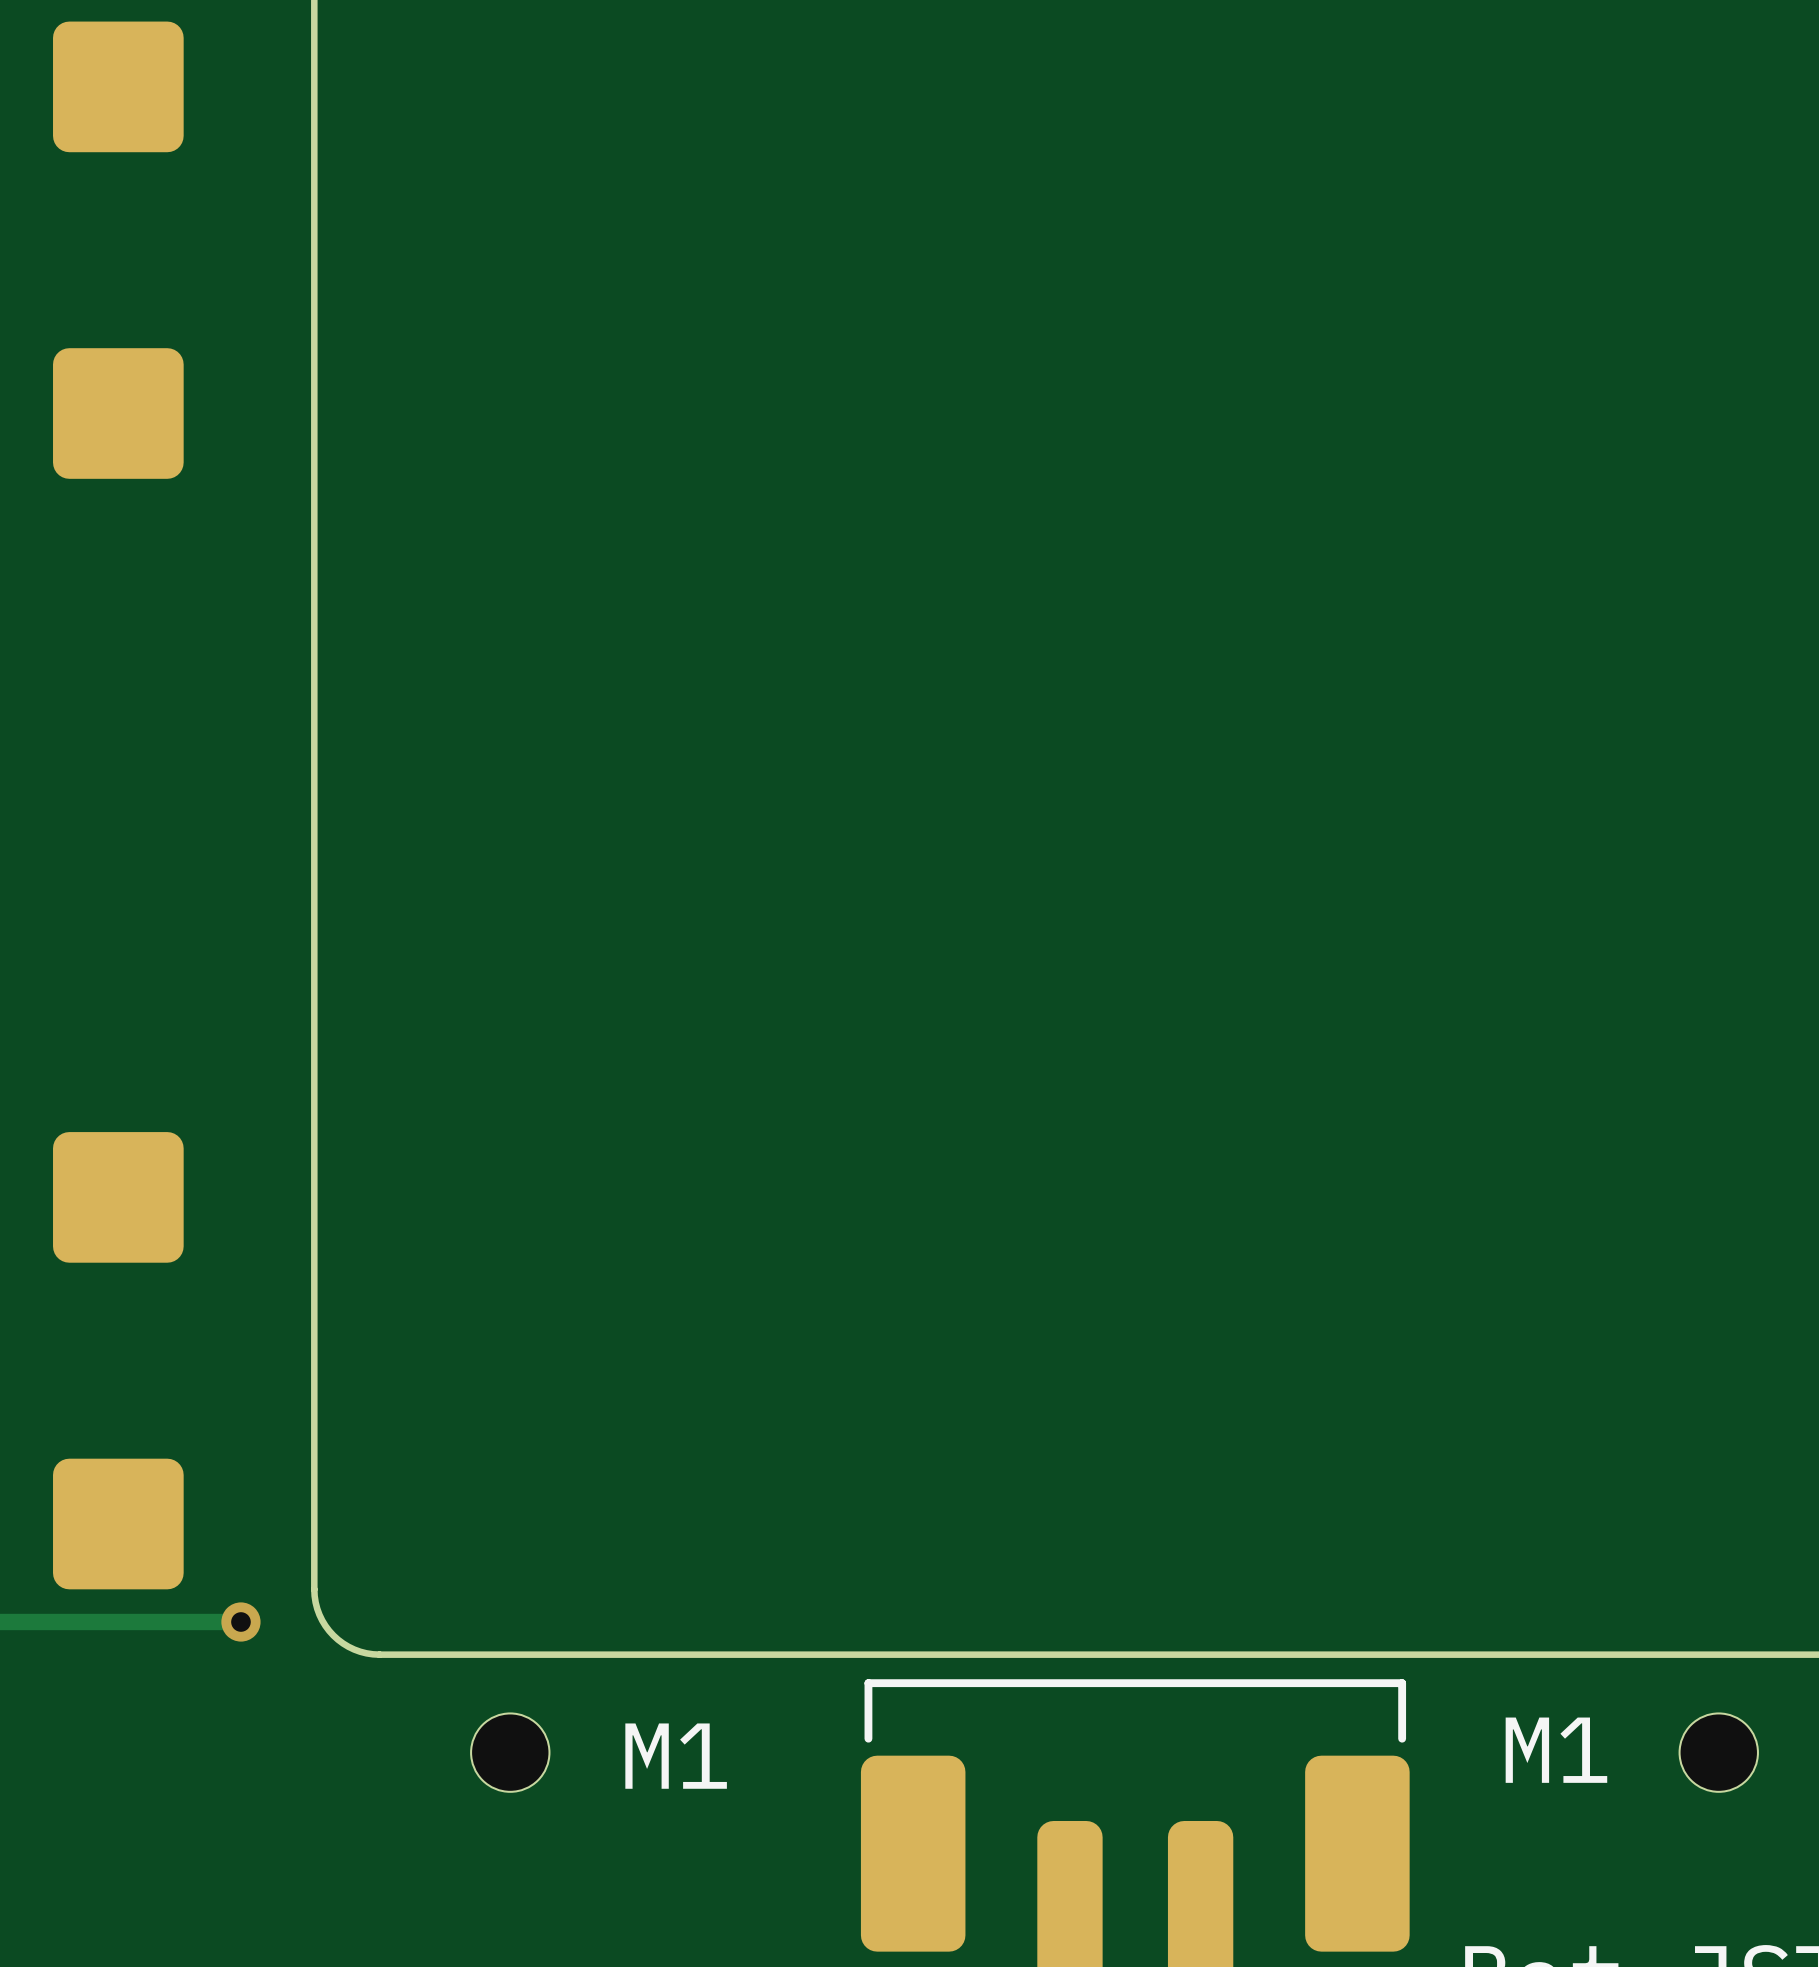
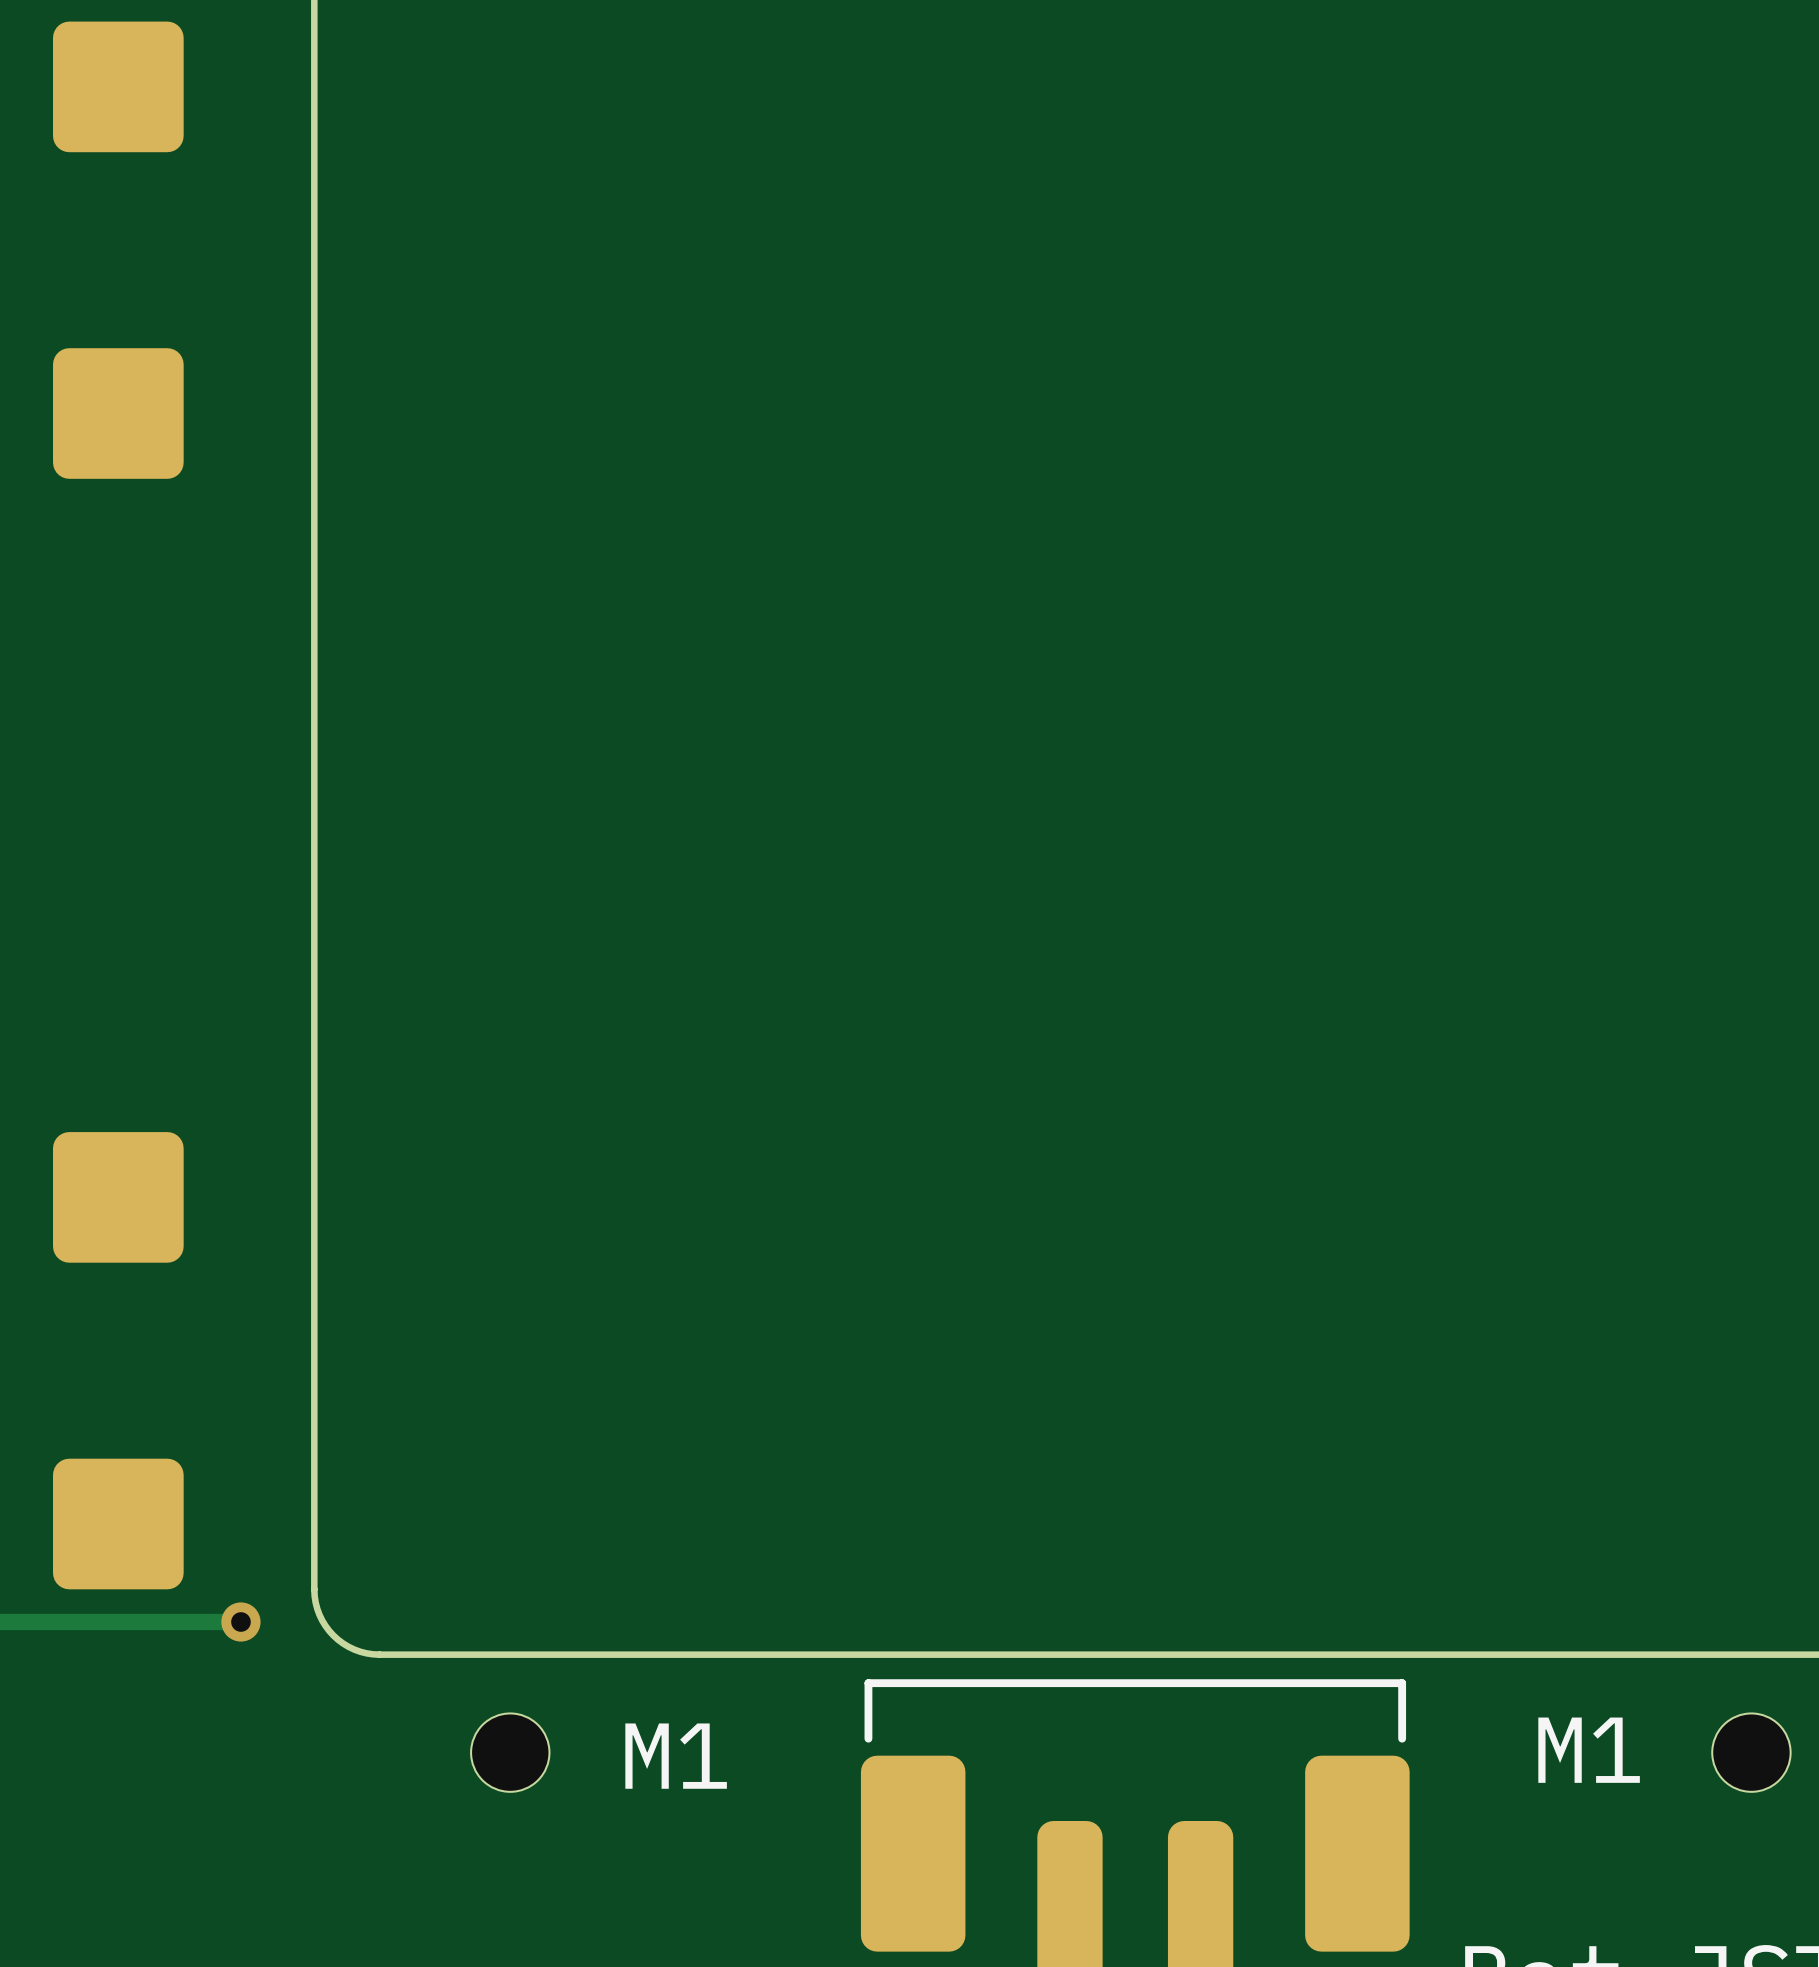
M1 position: (1718, 1752) -> (1751, 1752)

